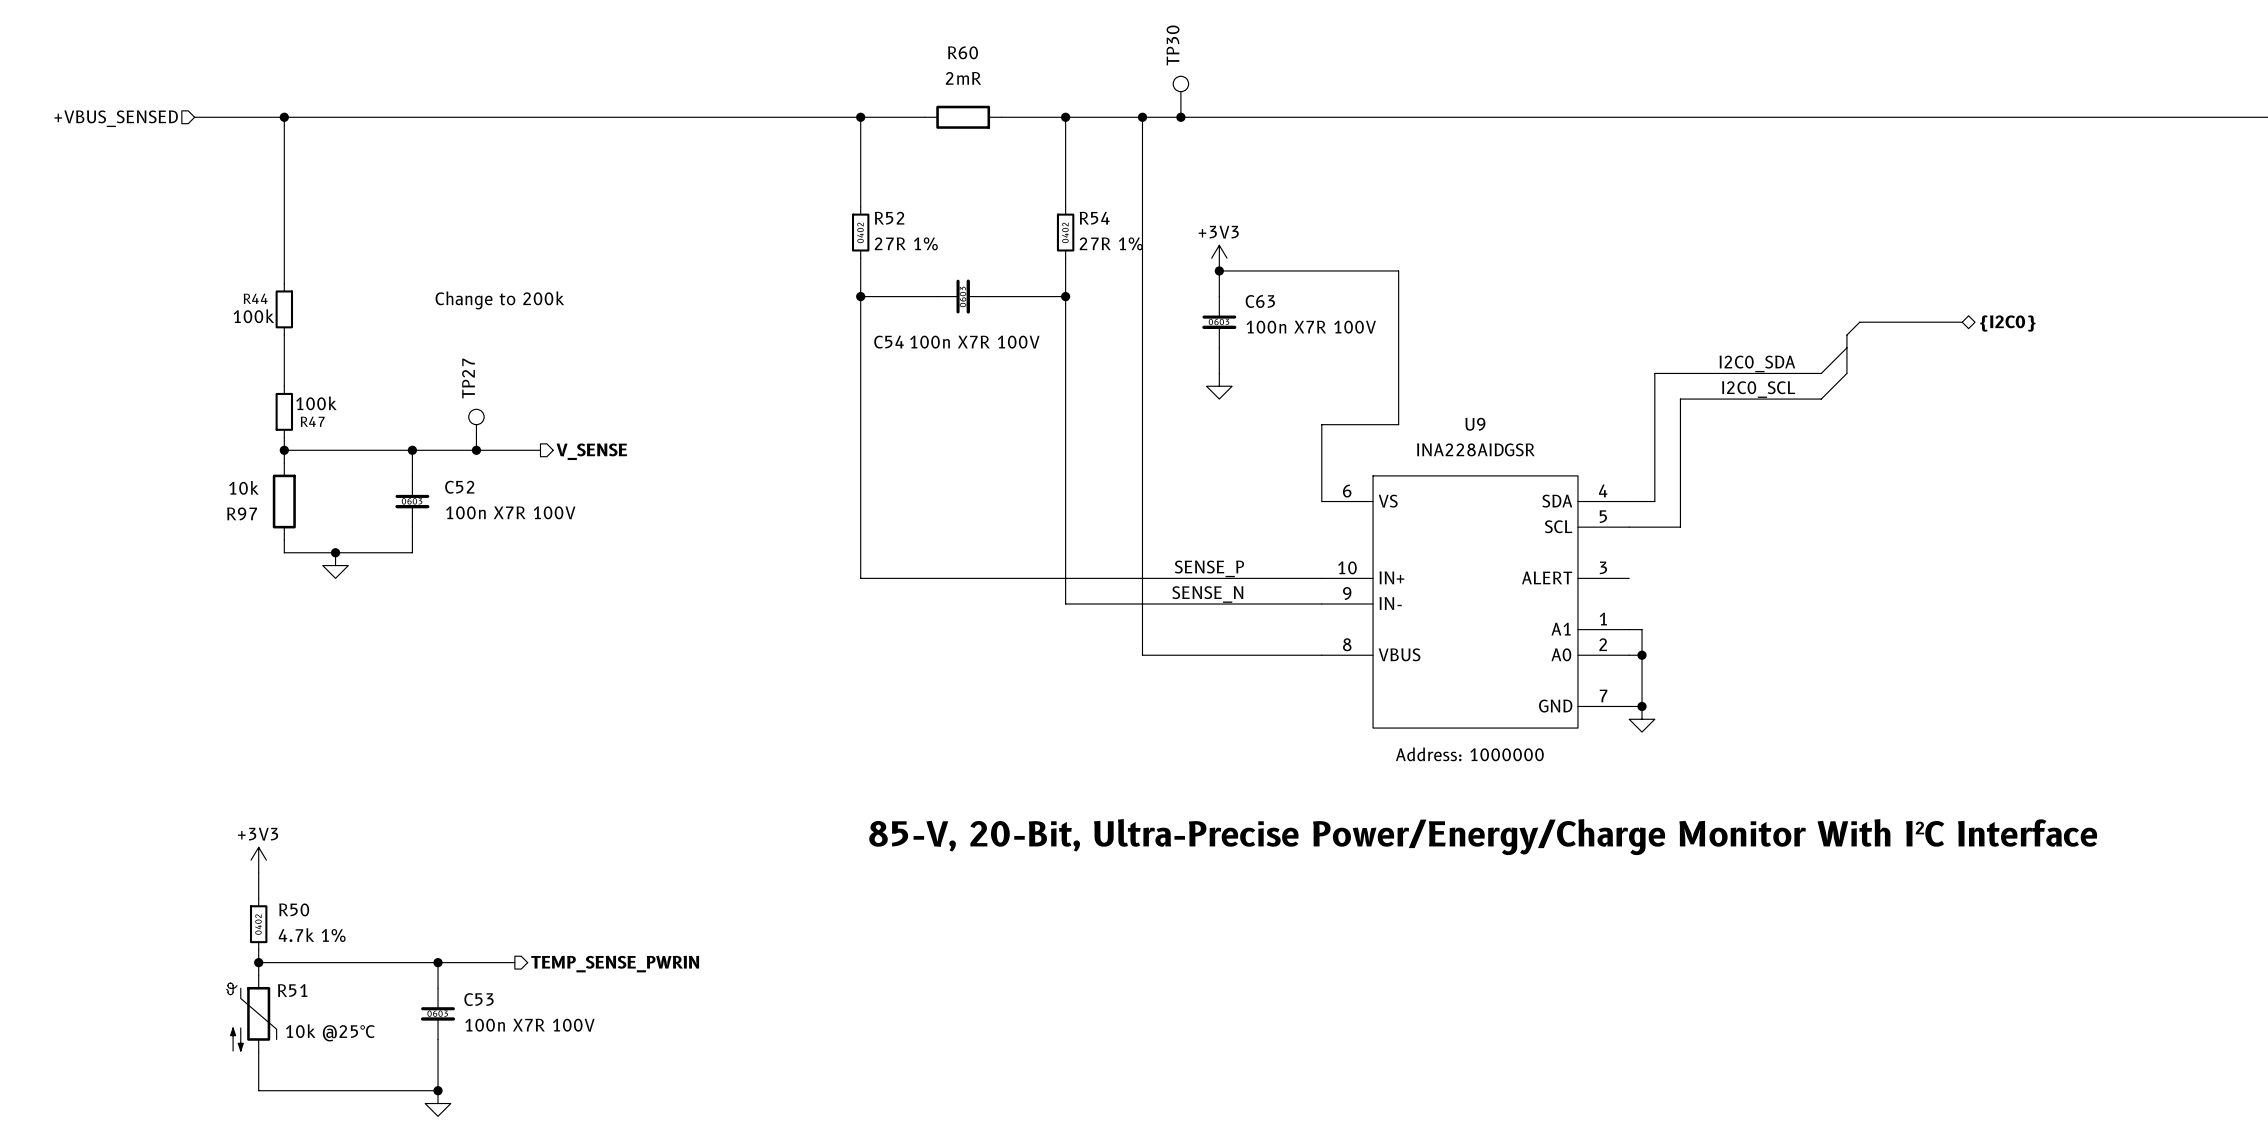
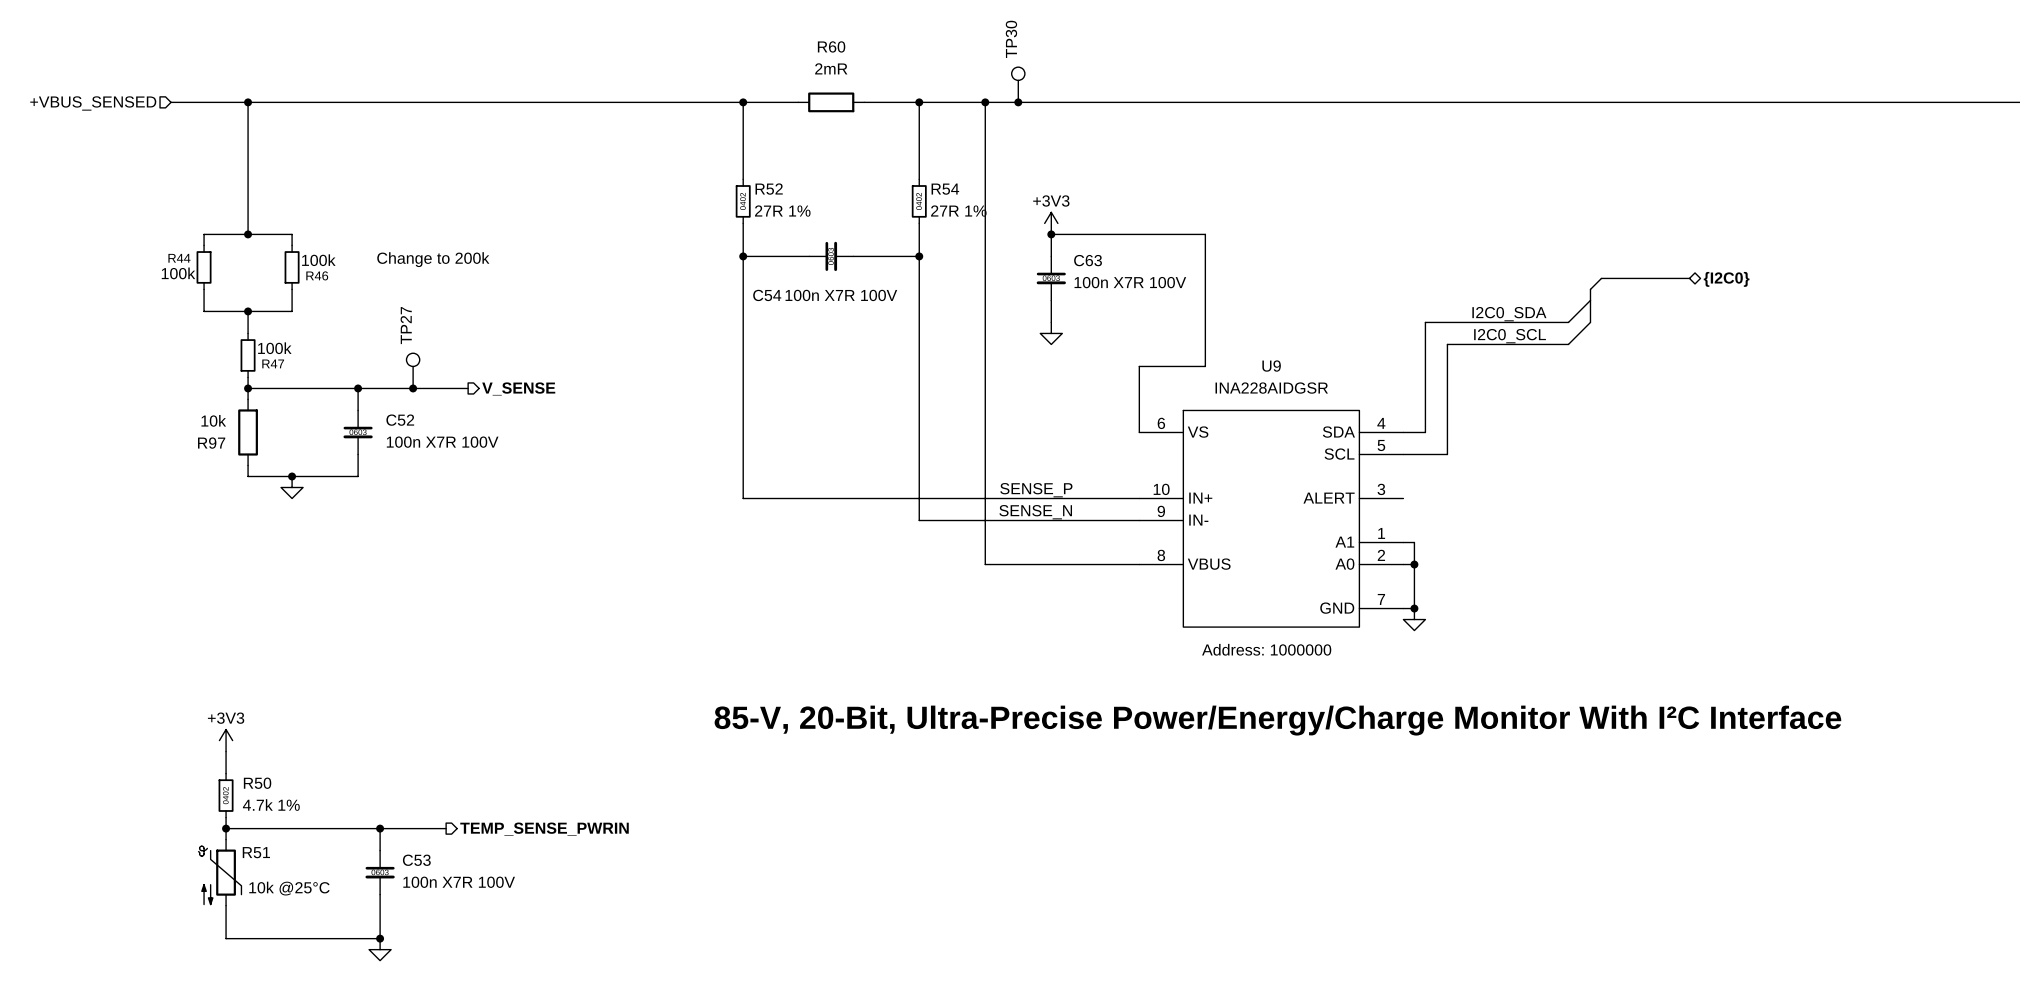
wire: (284, 270) (284, 283) -> none
junction: none -> (248, 234)
wire: none -> (204, 245) (204, 234) (292, 234) (292, 245)
R44 position: (284, 309) -> (204, 267)
R46: none -> 100k (292, 267)
wire: none -> (204, 289) (204, 311) (292, 311) (292, 289)
wire: (284, 335) (284, 360) -> none
junction: none -> (248, 311)

